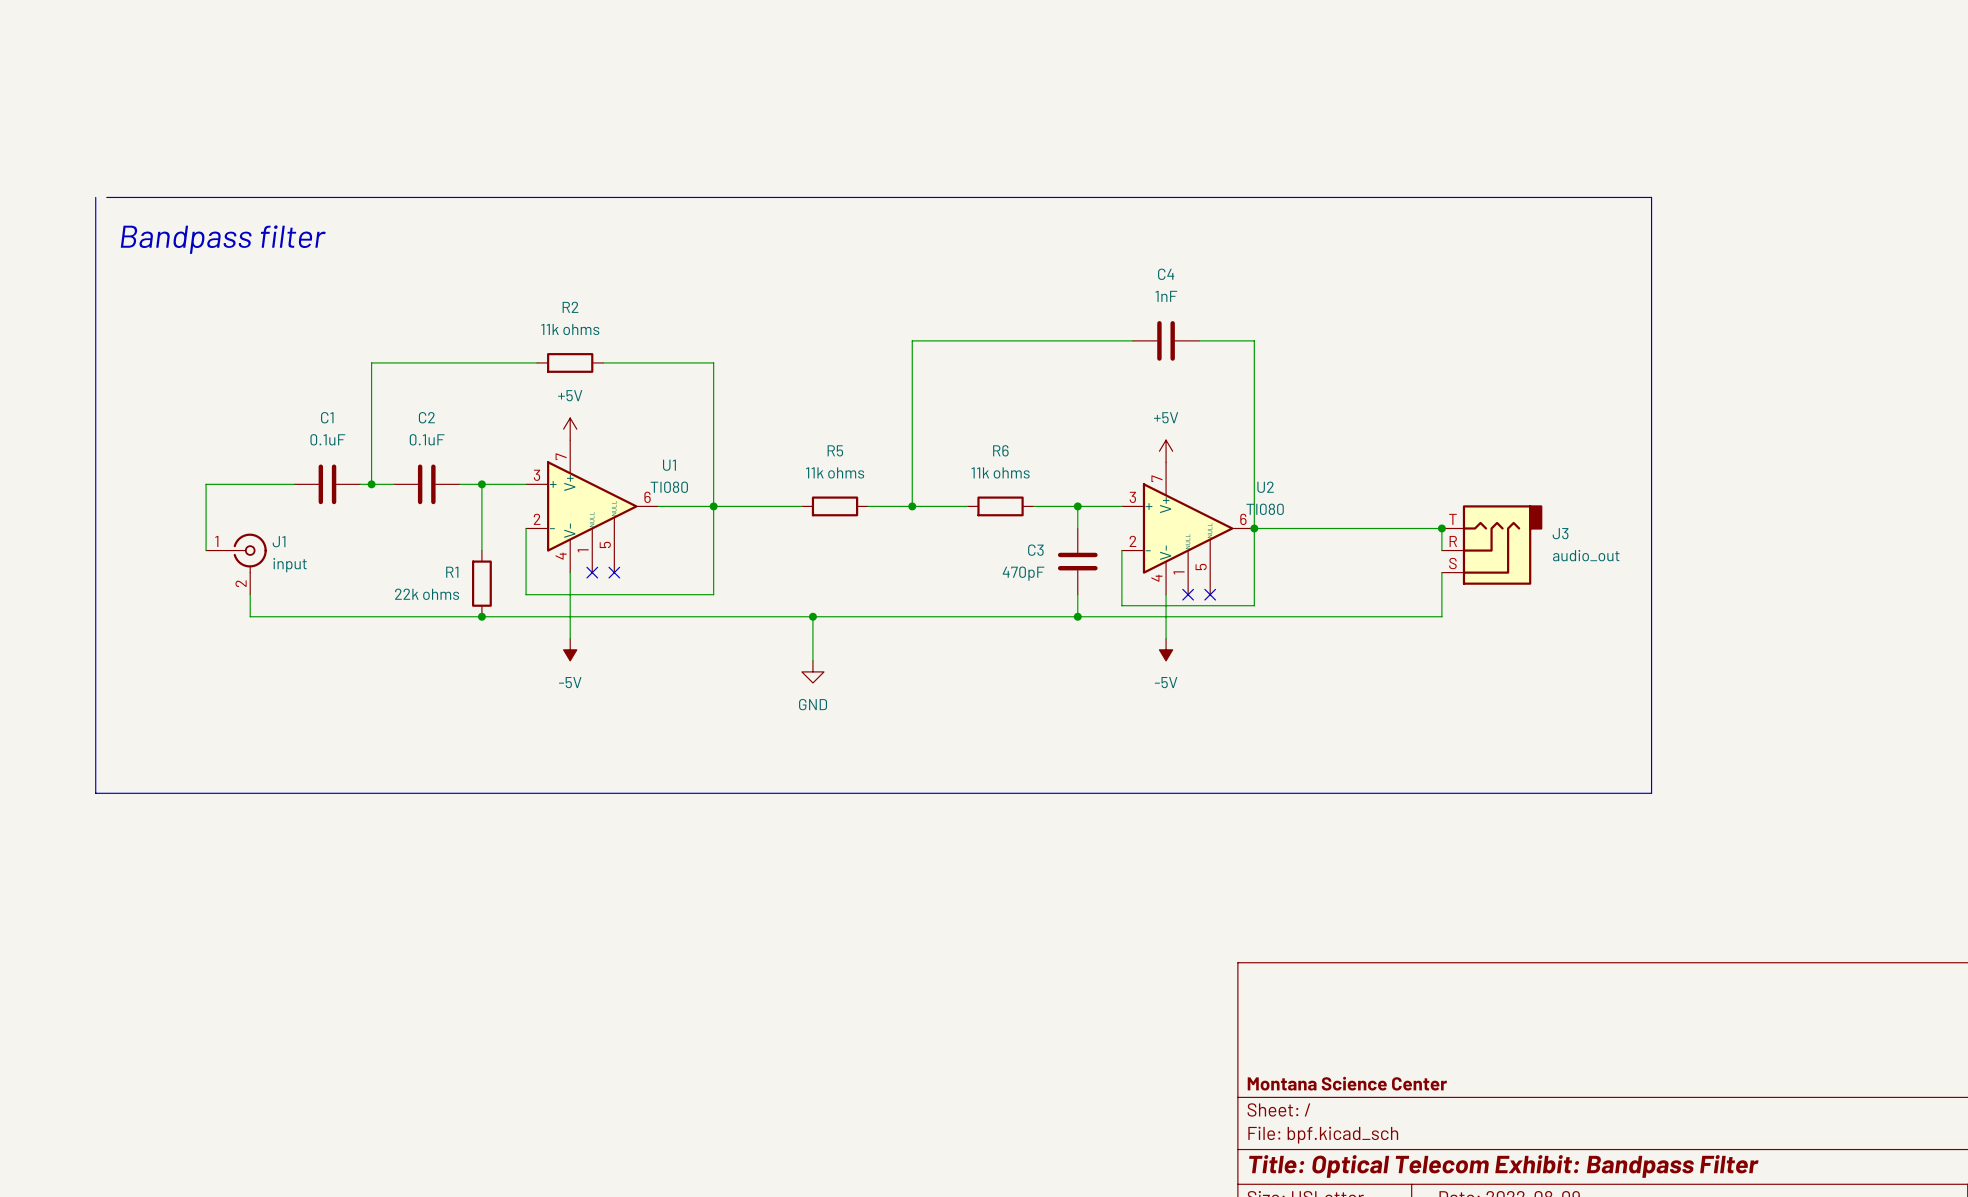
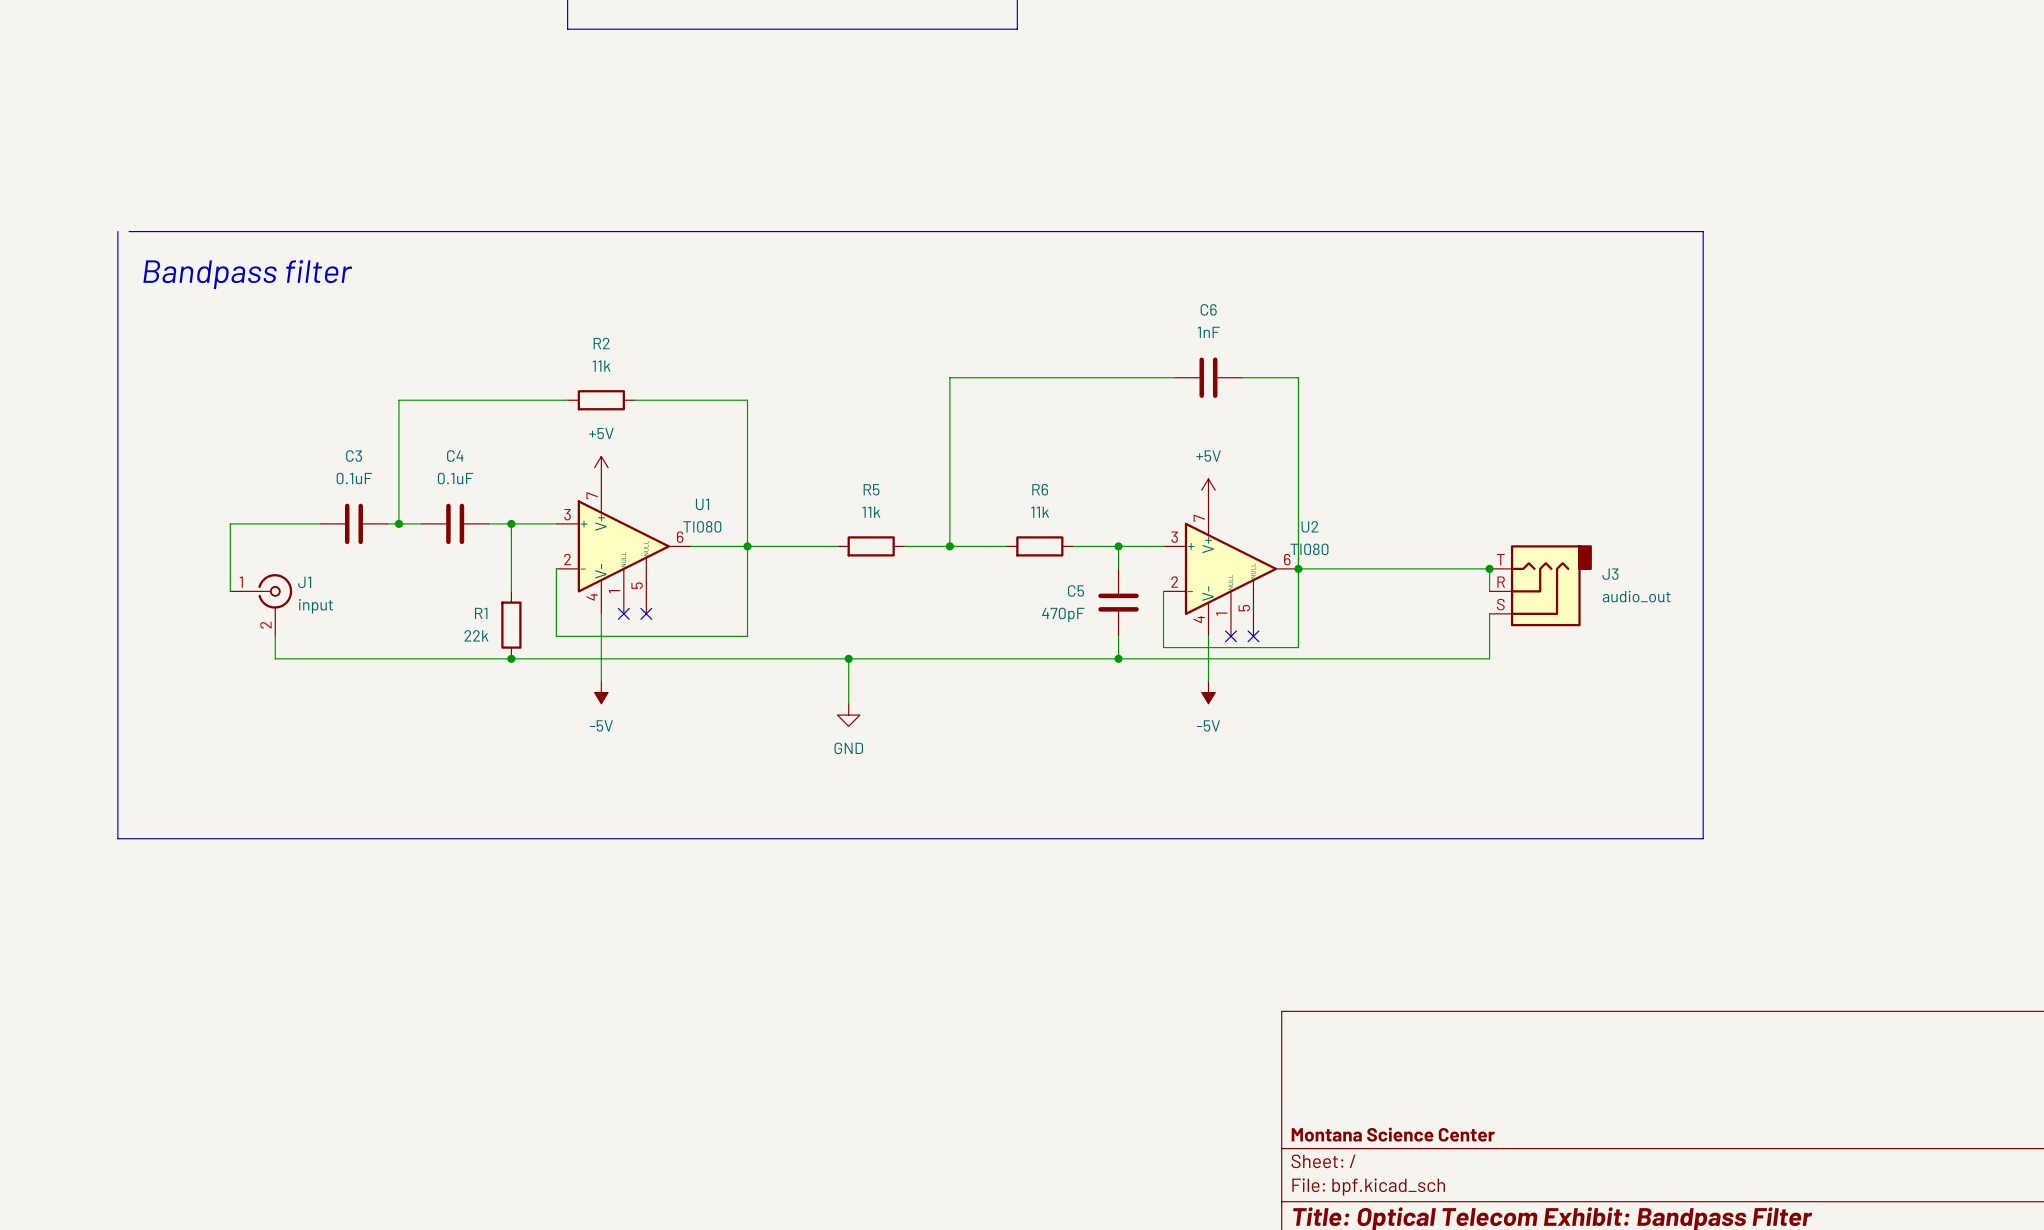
C4 name: C4 (1166, 274) -> C6 (1208, 309)
R2 value: 11k ohms (570, 329) -> 11k (601, 366)
C1 name: C1 (327, 417) -> C3 (354, 456)
C2 name: C2 (426, 417) -> C4 (455, 456)
R5 value: 11k ohms (835, 472) -> 11k (871, 512)
R6 value: 11k ohms (1000, 472) -> 11k (1040, 512)
C3 name: C3 (1035, 550) -> C5 (1075, 590)
R1 value: 22k ohms (427, 594) -> 22k (476, 635)

